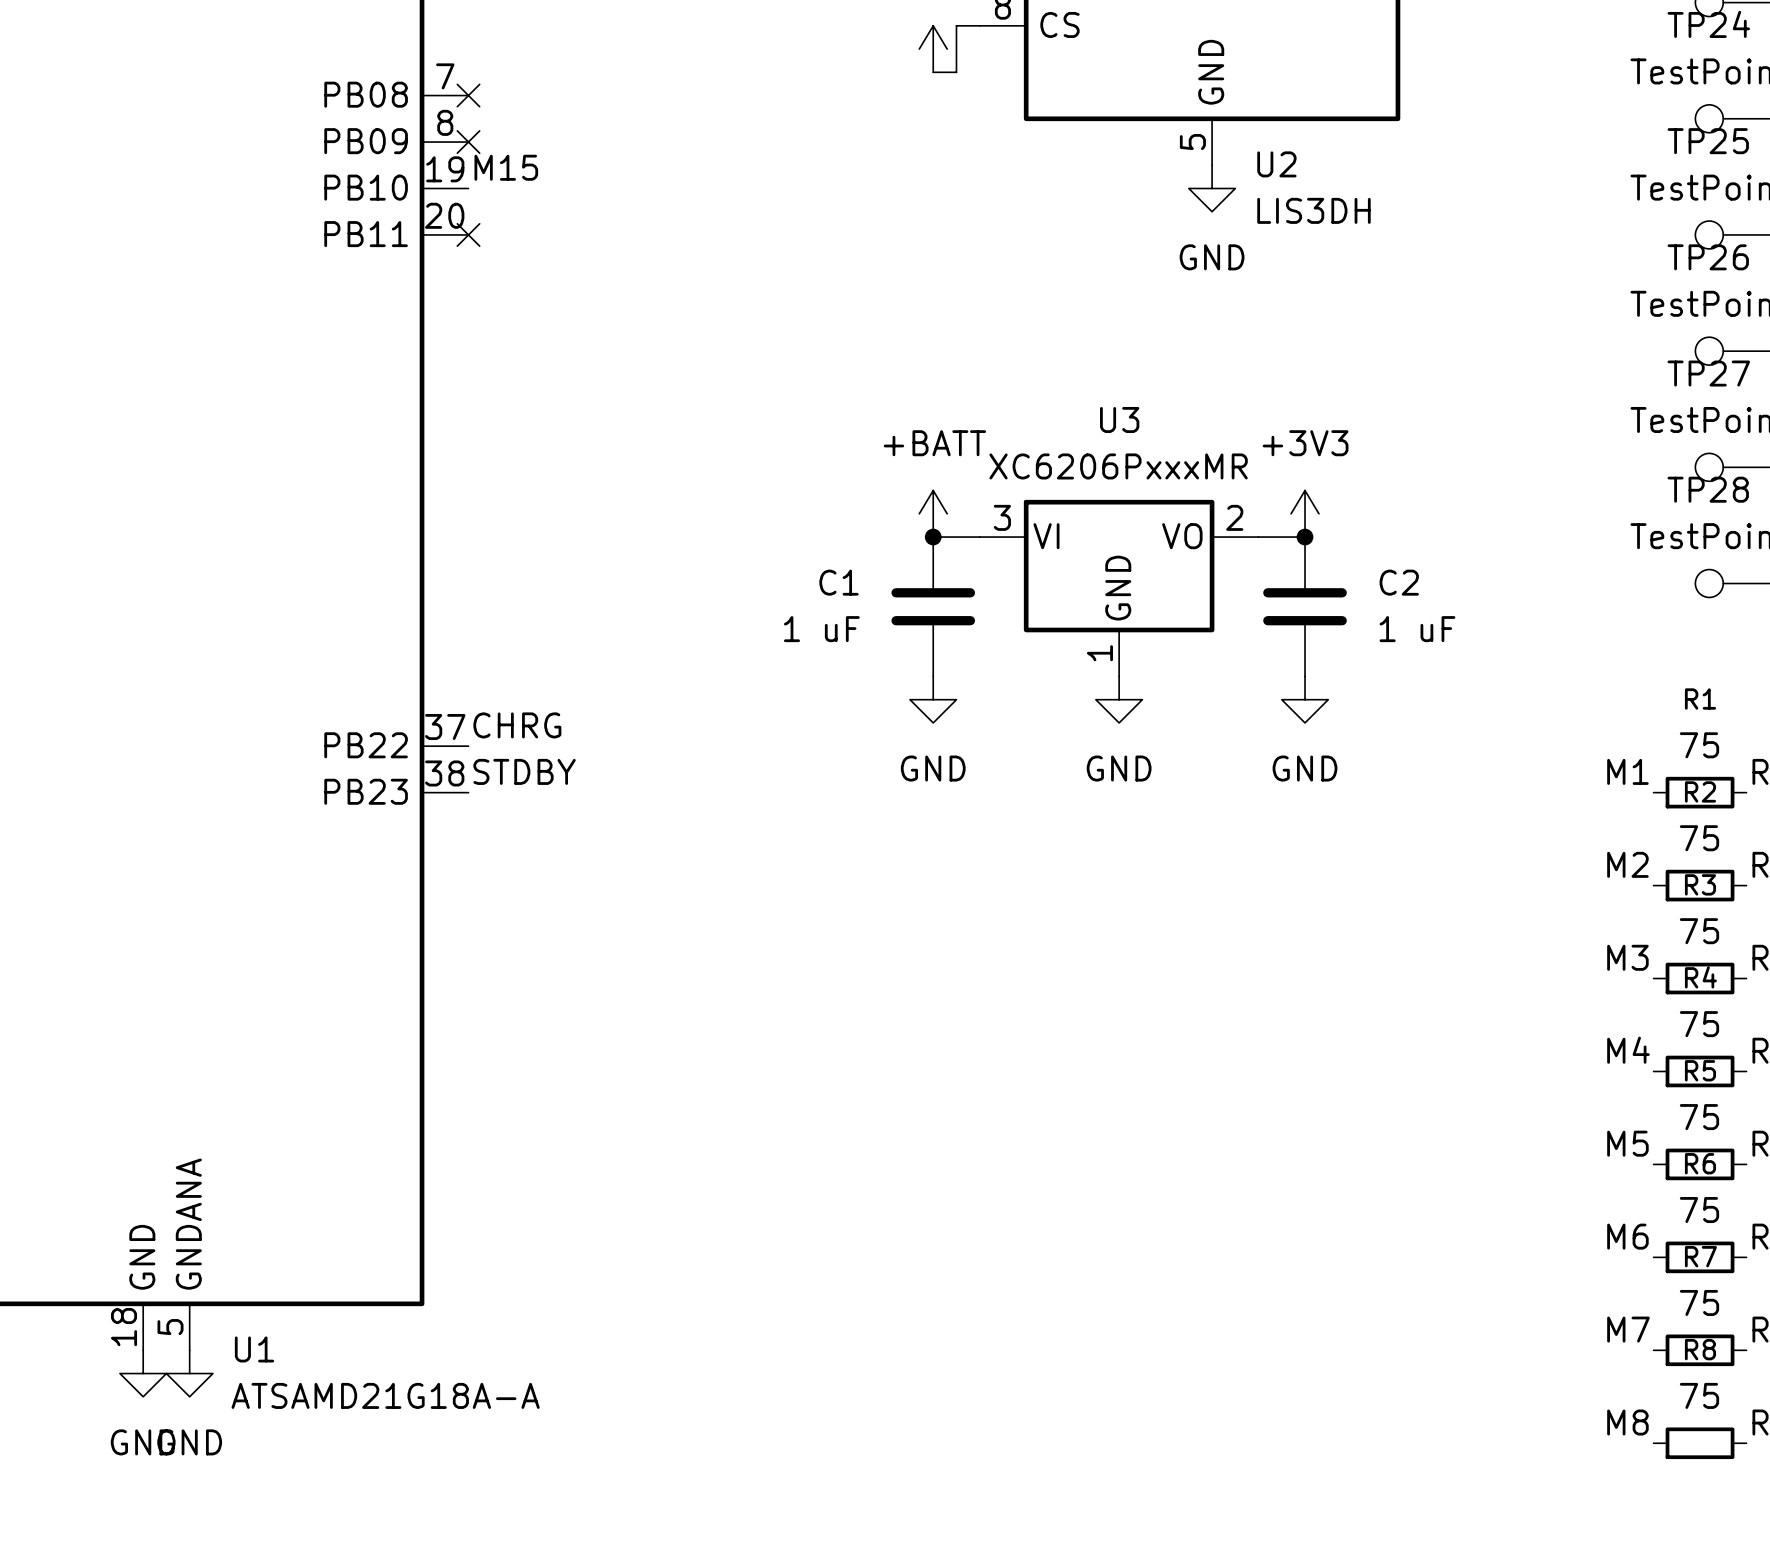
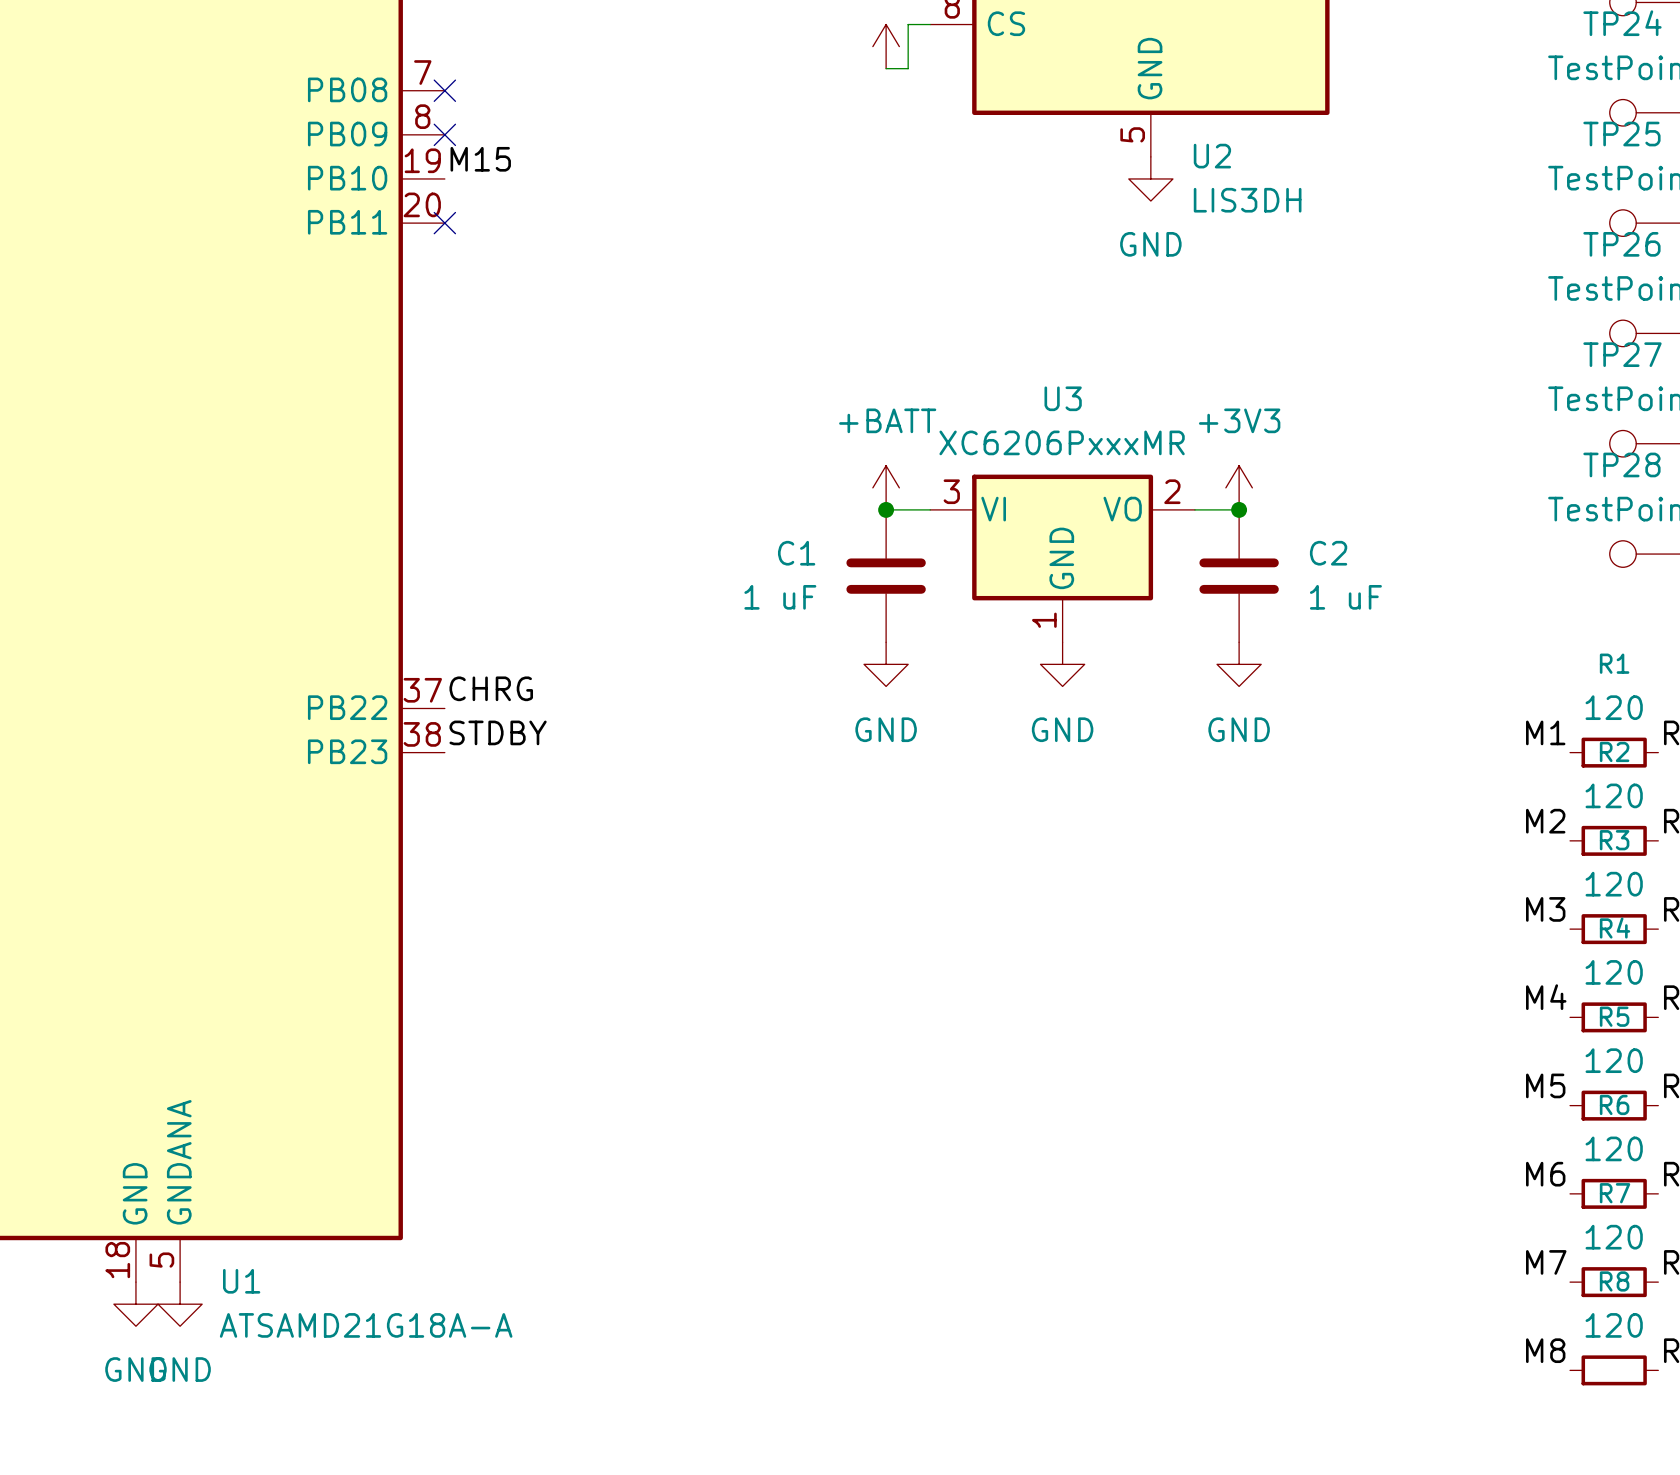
R1 value: 75 (1699, 745) -> 120 (1614, 707)
R2 value: 75 (1699, 838) -> 120 (1614, 795)
R3 value: 75 (1699, 931) -> 120 (1614, 884)
R4 value: 75 (1699, 1024) -> 120 (1614, 972)
R5 value: 75 (1699, 1117) -> 120 (1614, 1060)
R6 value: 75 (1699, 1210) -> 120 (1614, 1148)
R7 value: 75 (1699, 1302) -> 120 (1614, 1237)
R8 value: 75 (1699, 1395) -> 120 (1614, 1325)

